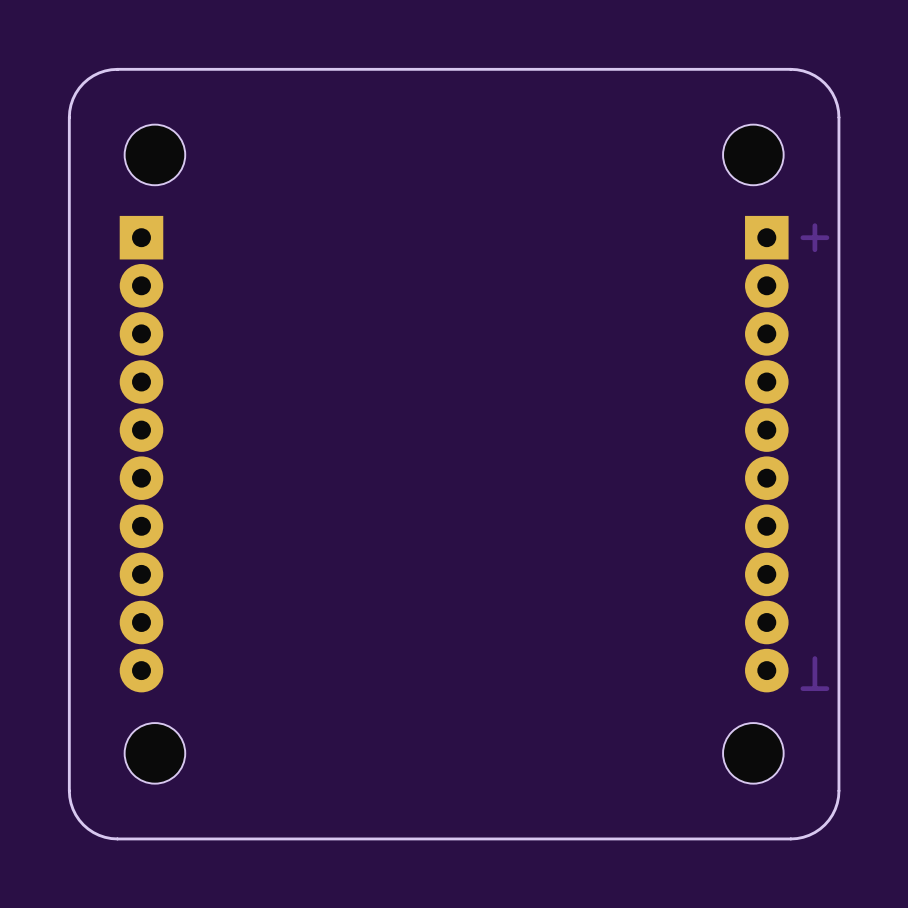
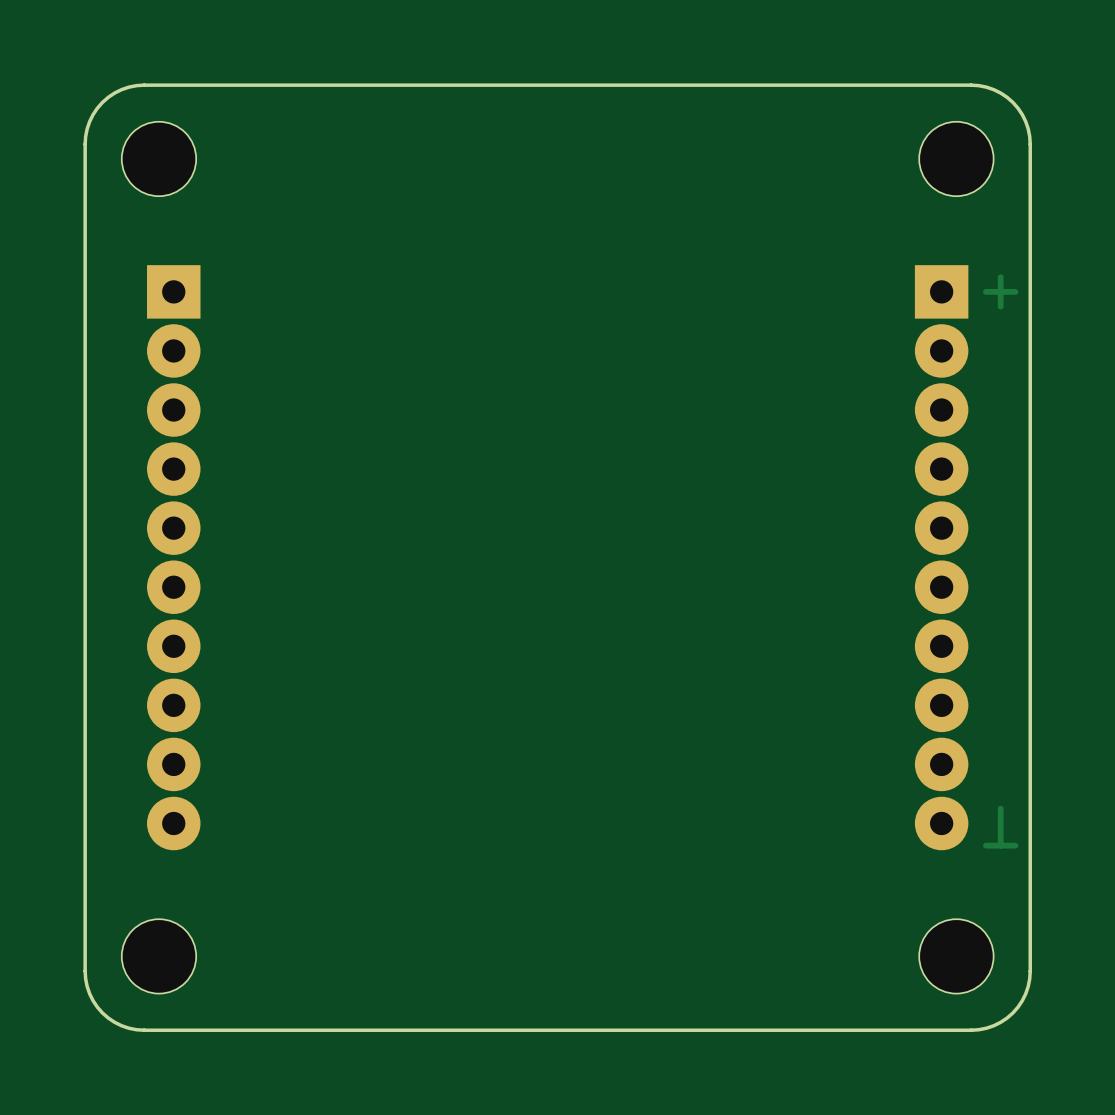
part position: (154, 154) -> (158, 158)
part position: (753, 154) -> (956, 158)
part position: (154, 753) -> (158, 956)
part position: (753, 753) -> (956, 956)

